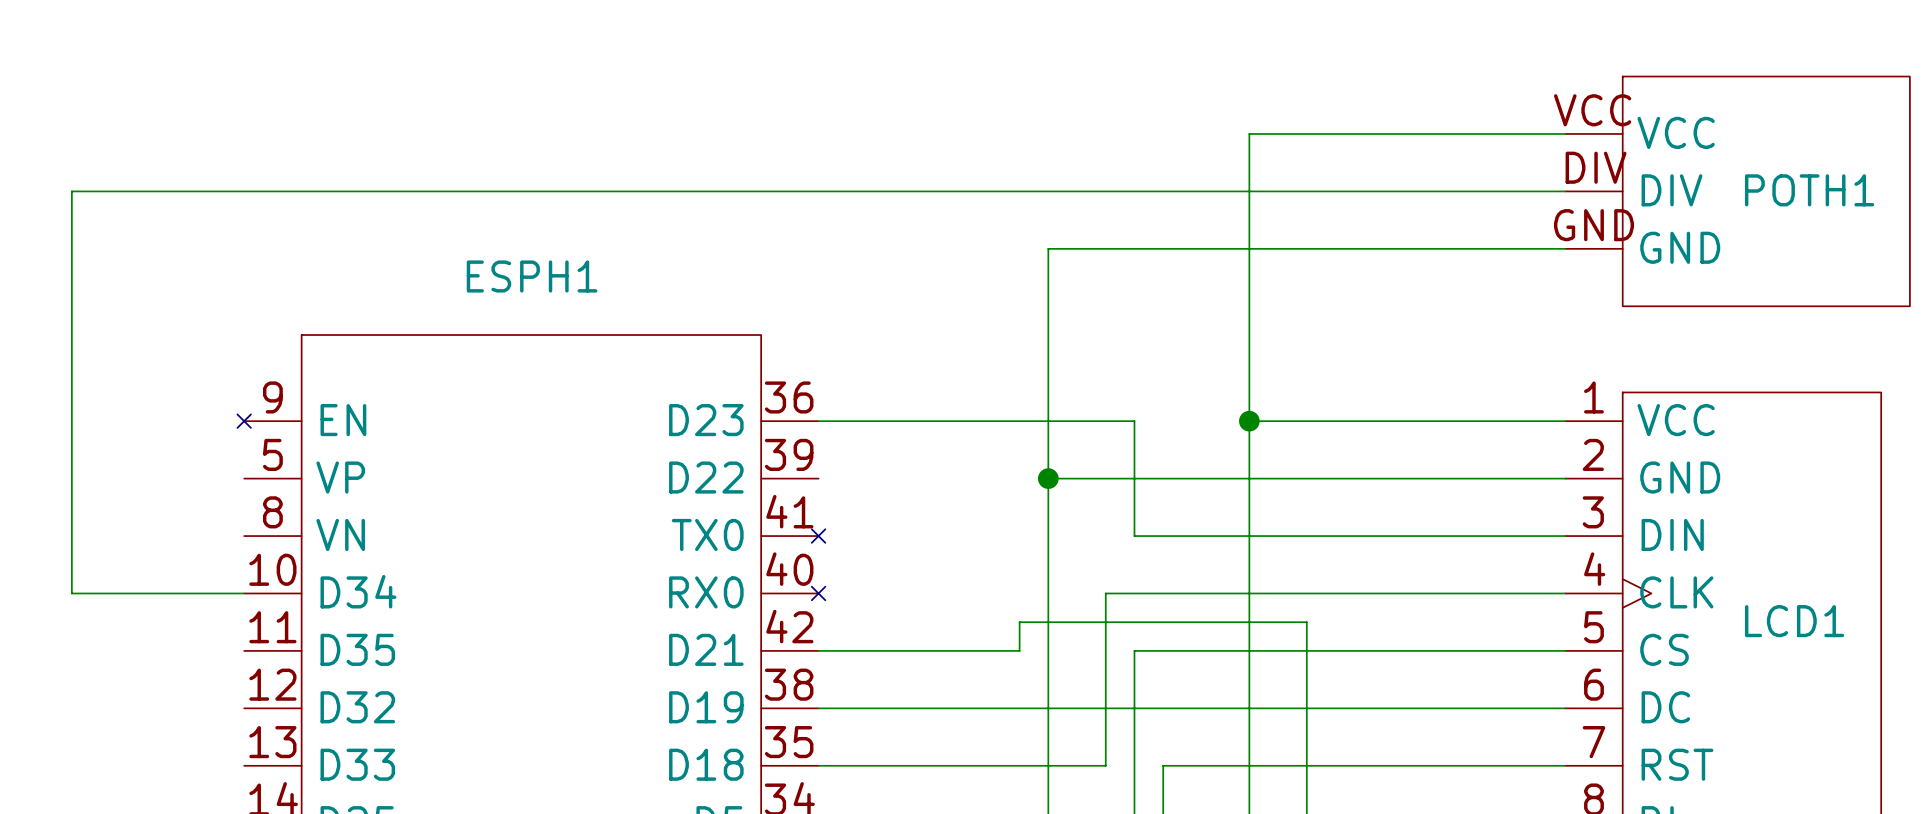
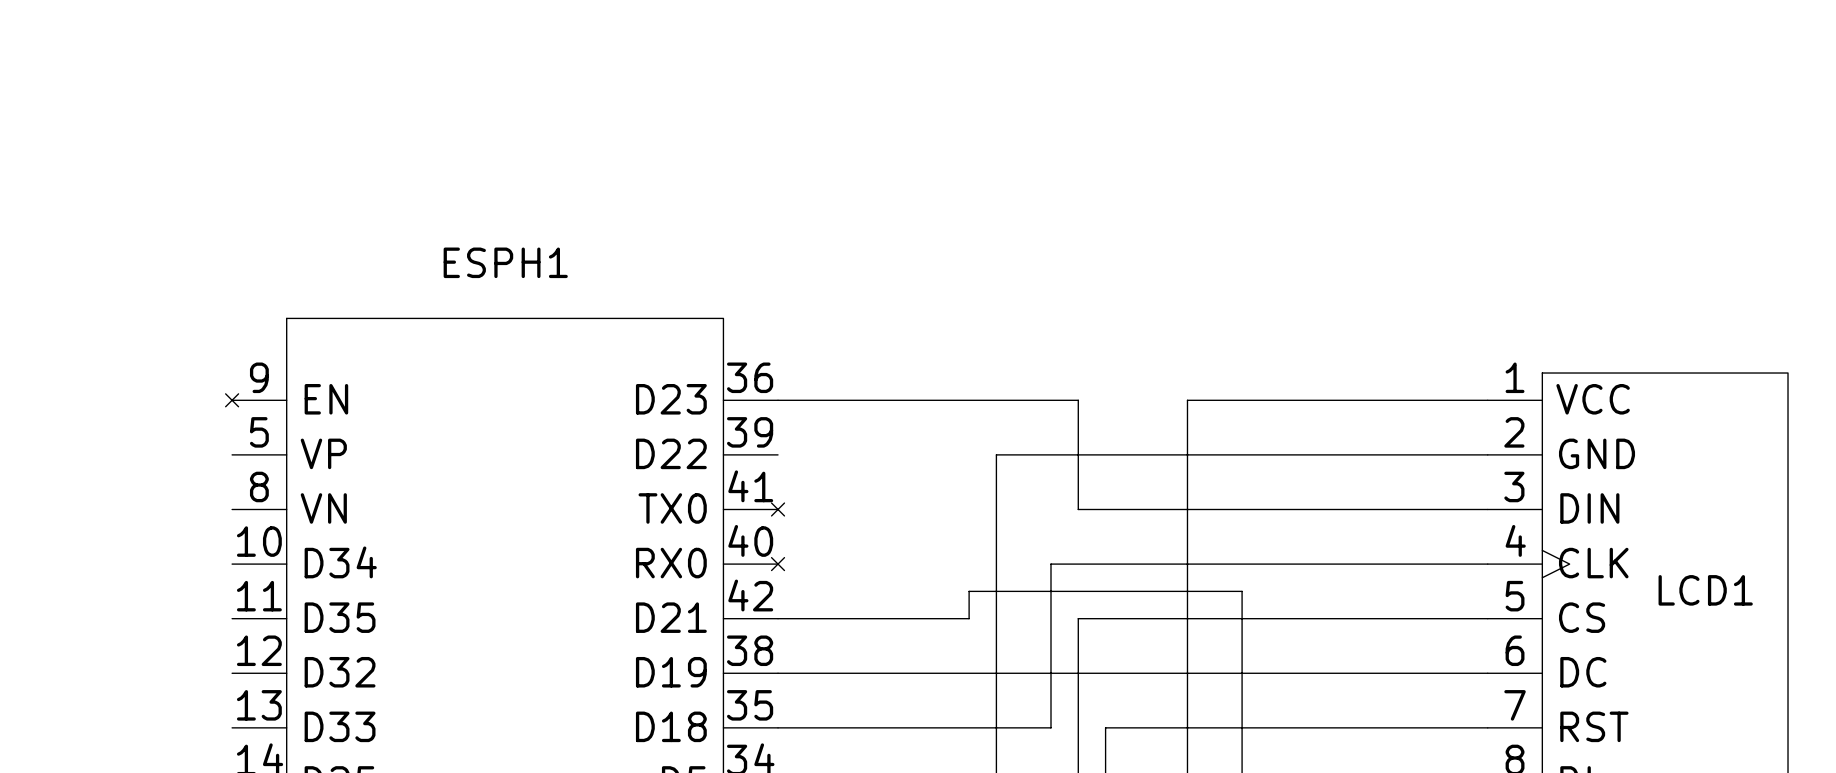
wire: (1565, 133) (1249, 133) (1249, 421) -> none
wire: (1565, 191) (71, 191) (71, 593) (244, 593) -> none
POTH1: (1737, 191) -> none
wire: (1565, 248) (1048, 248) (1048, 478) -> none
junction: (1249, 421) -> none
junction: (1048, 478) -> none

